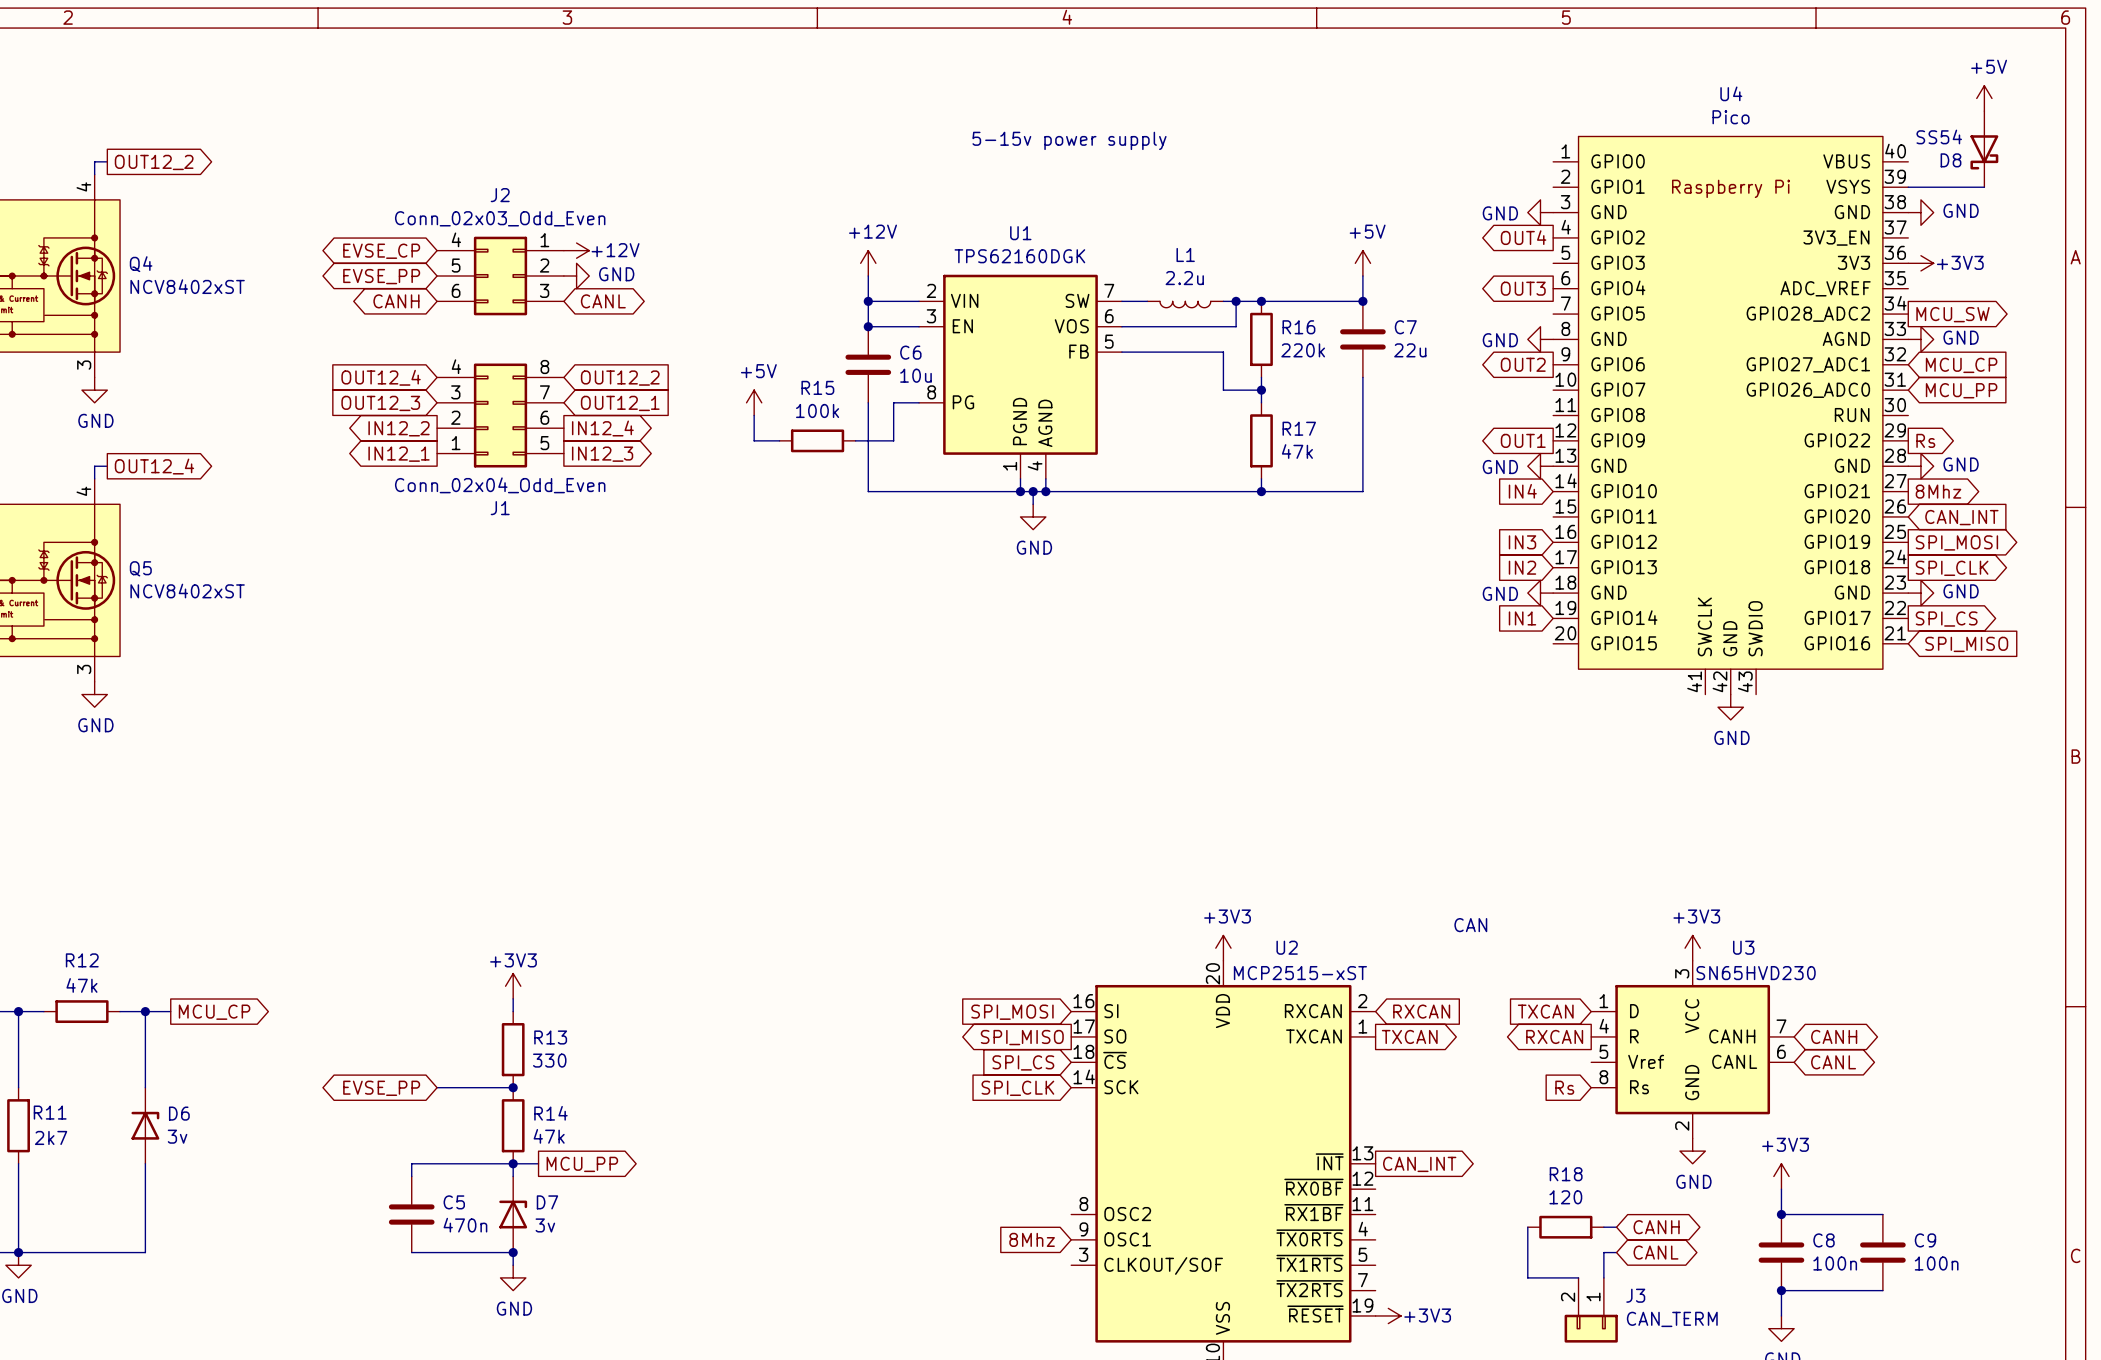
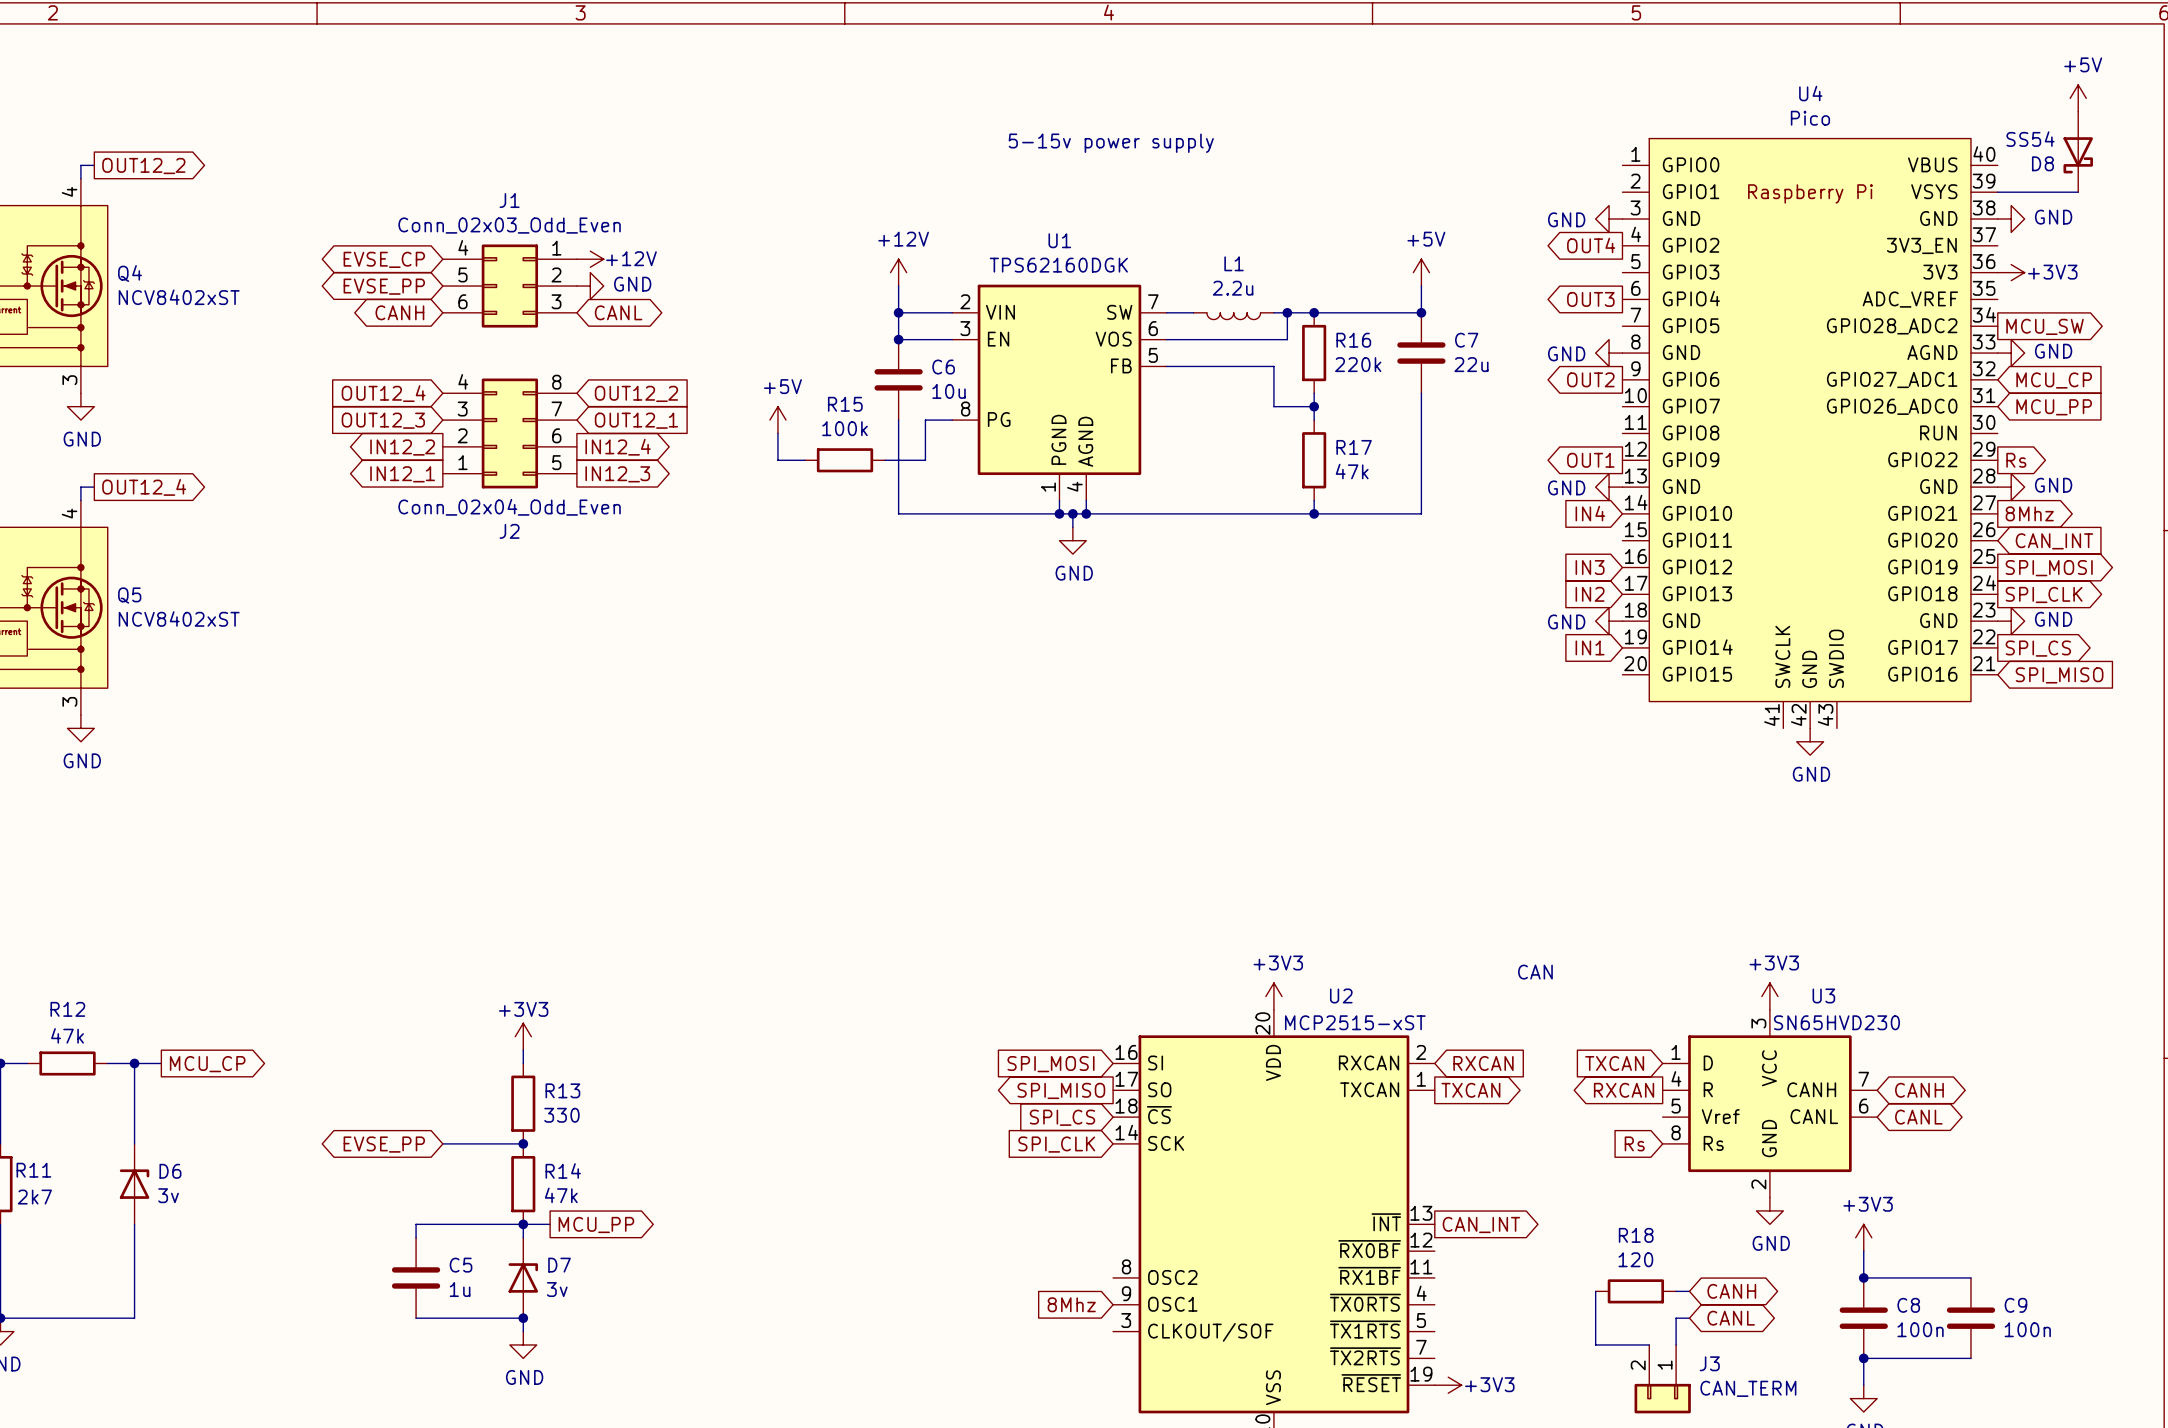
J2 name: J2 (500, 195) -> J1 (509, 200)
J1 name: J1 (500, 508) -> J2 (509, 531)
C5 value: 470n (465, 1225) -> 1u (460, 1289)

